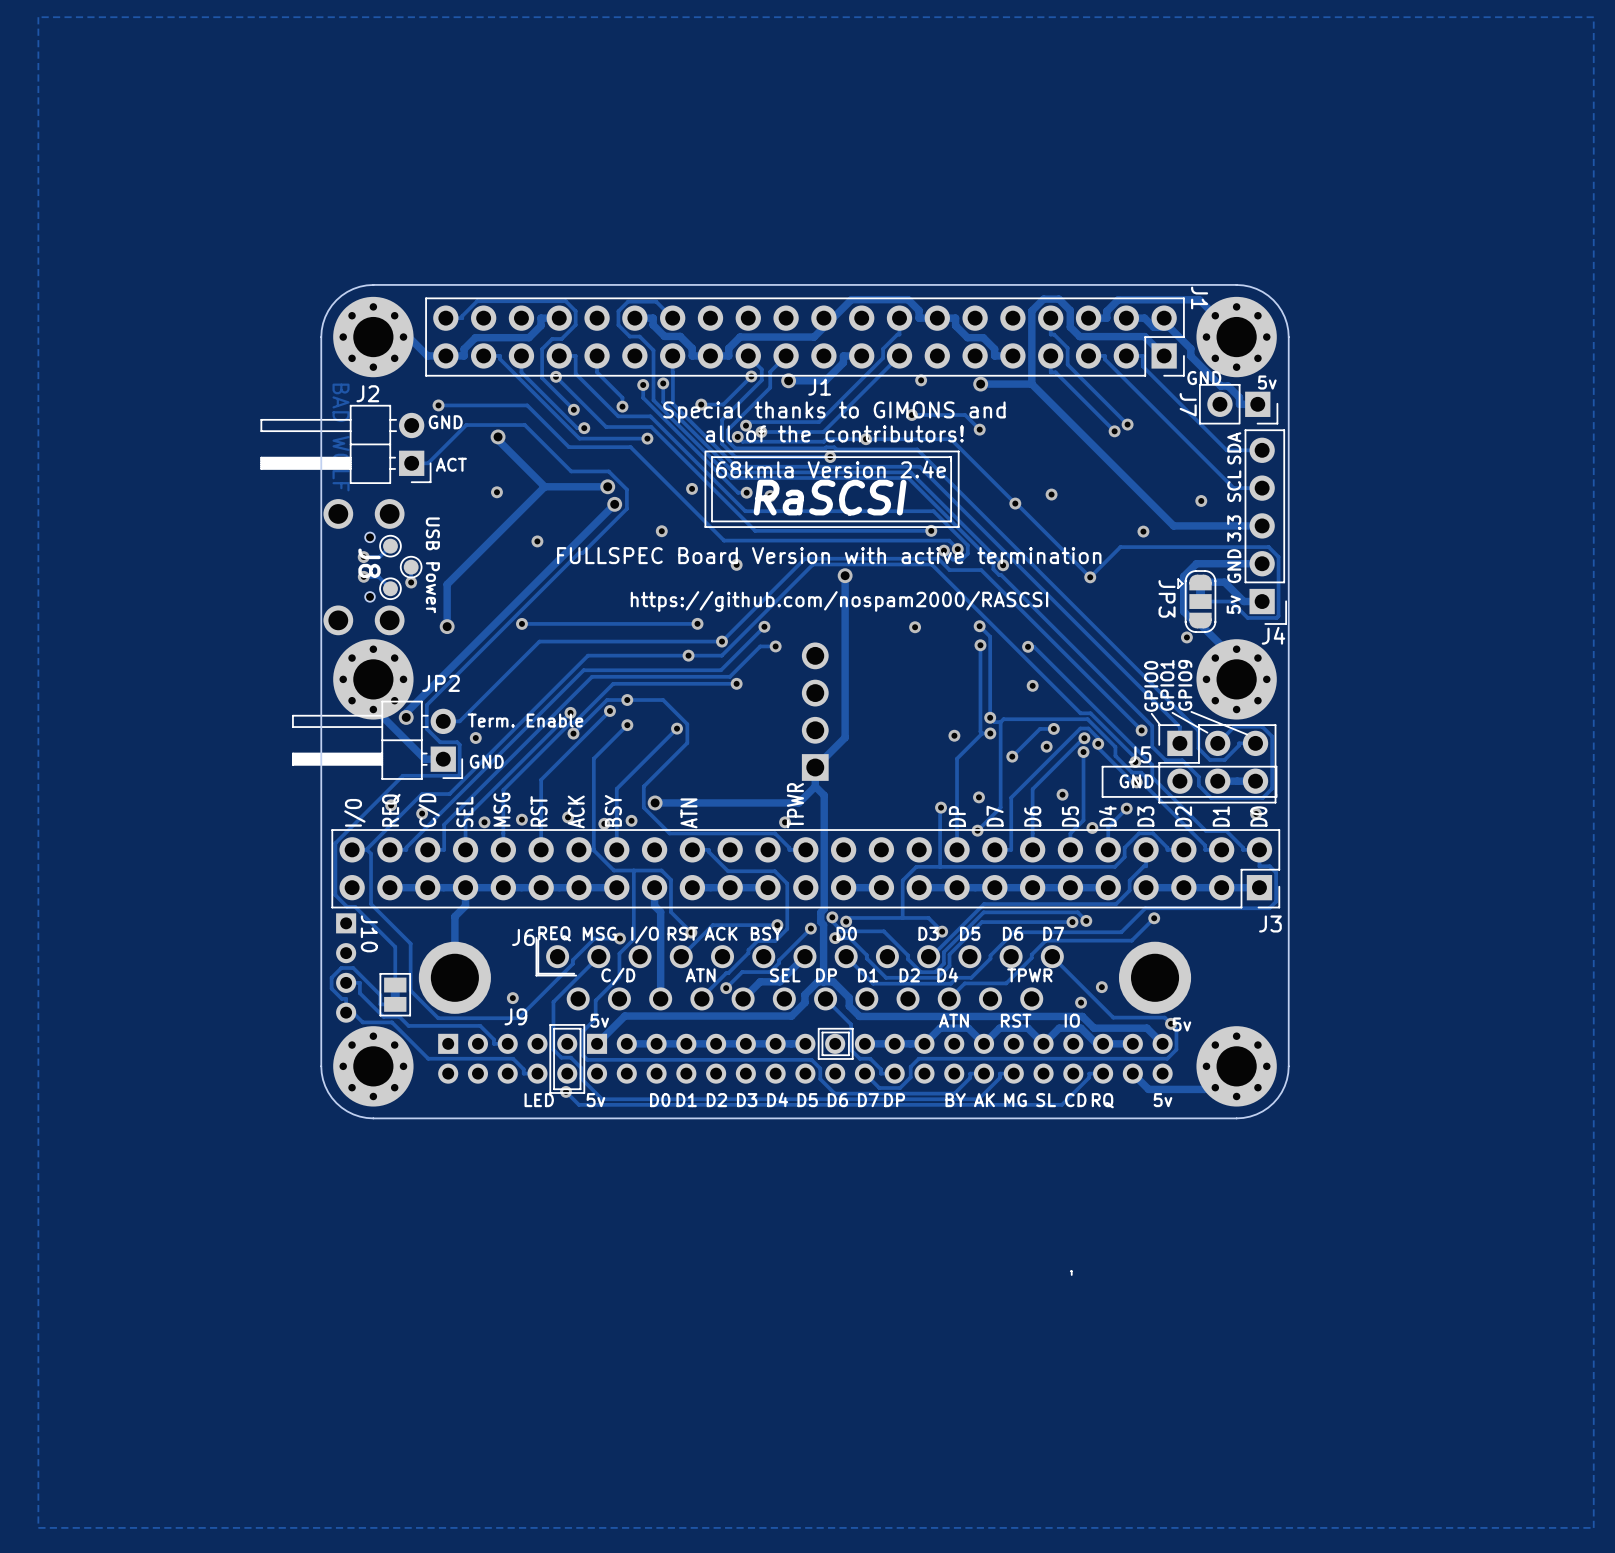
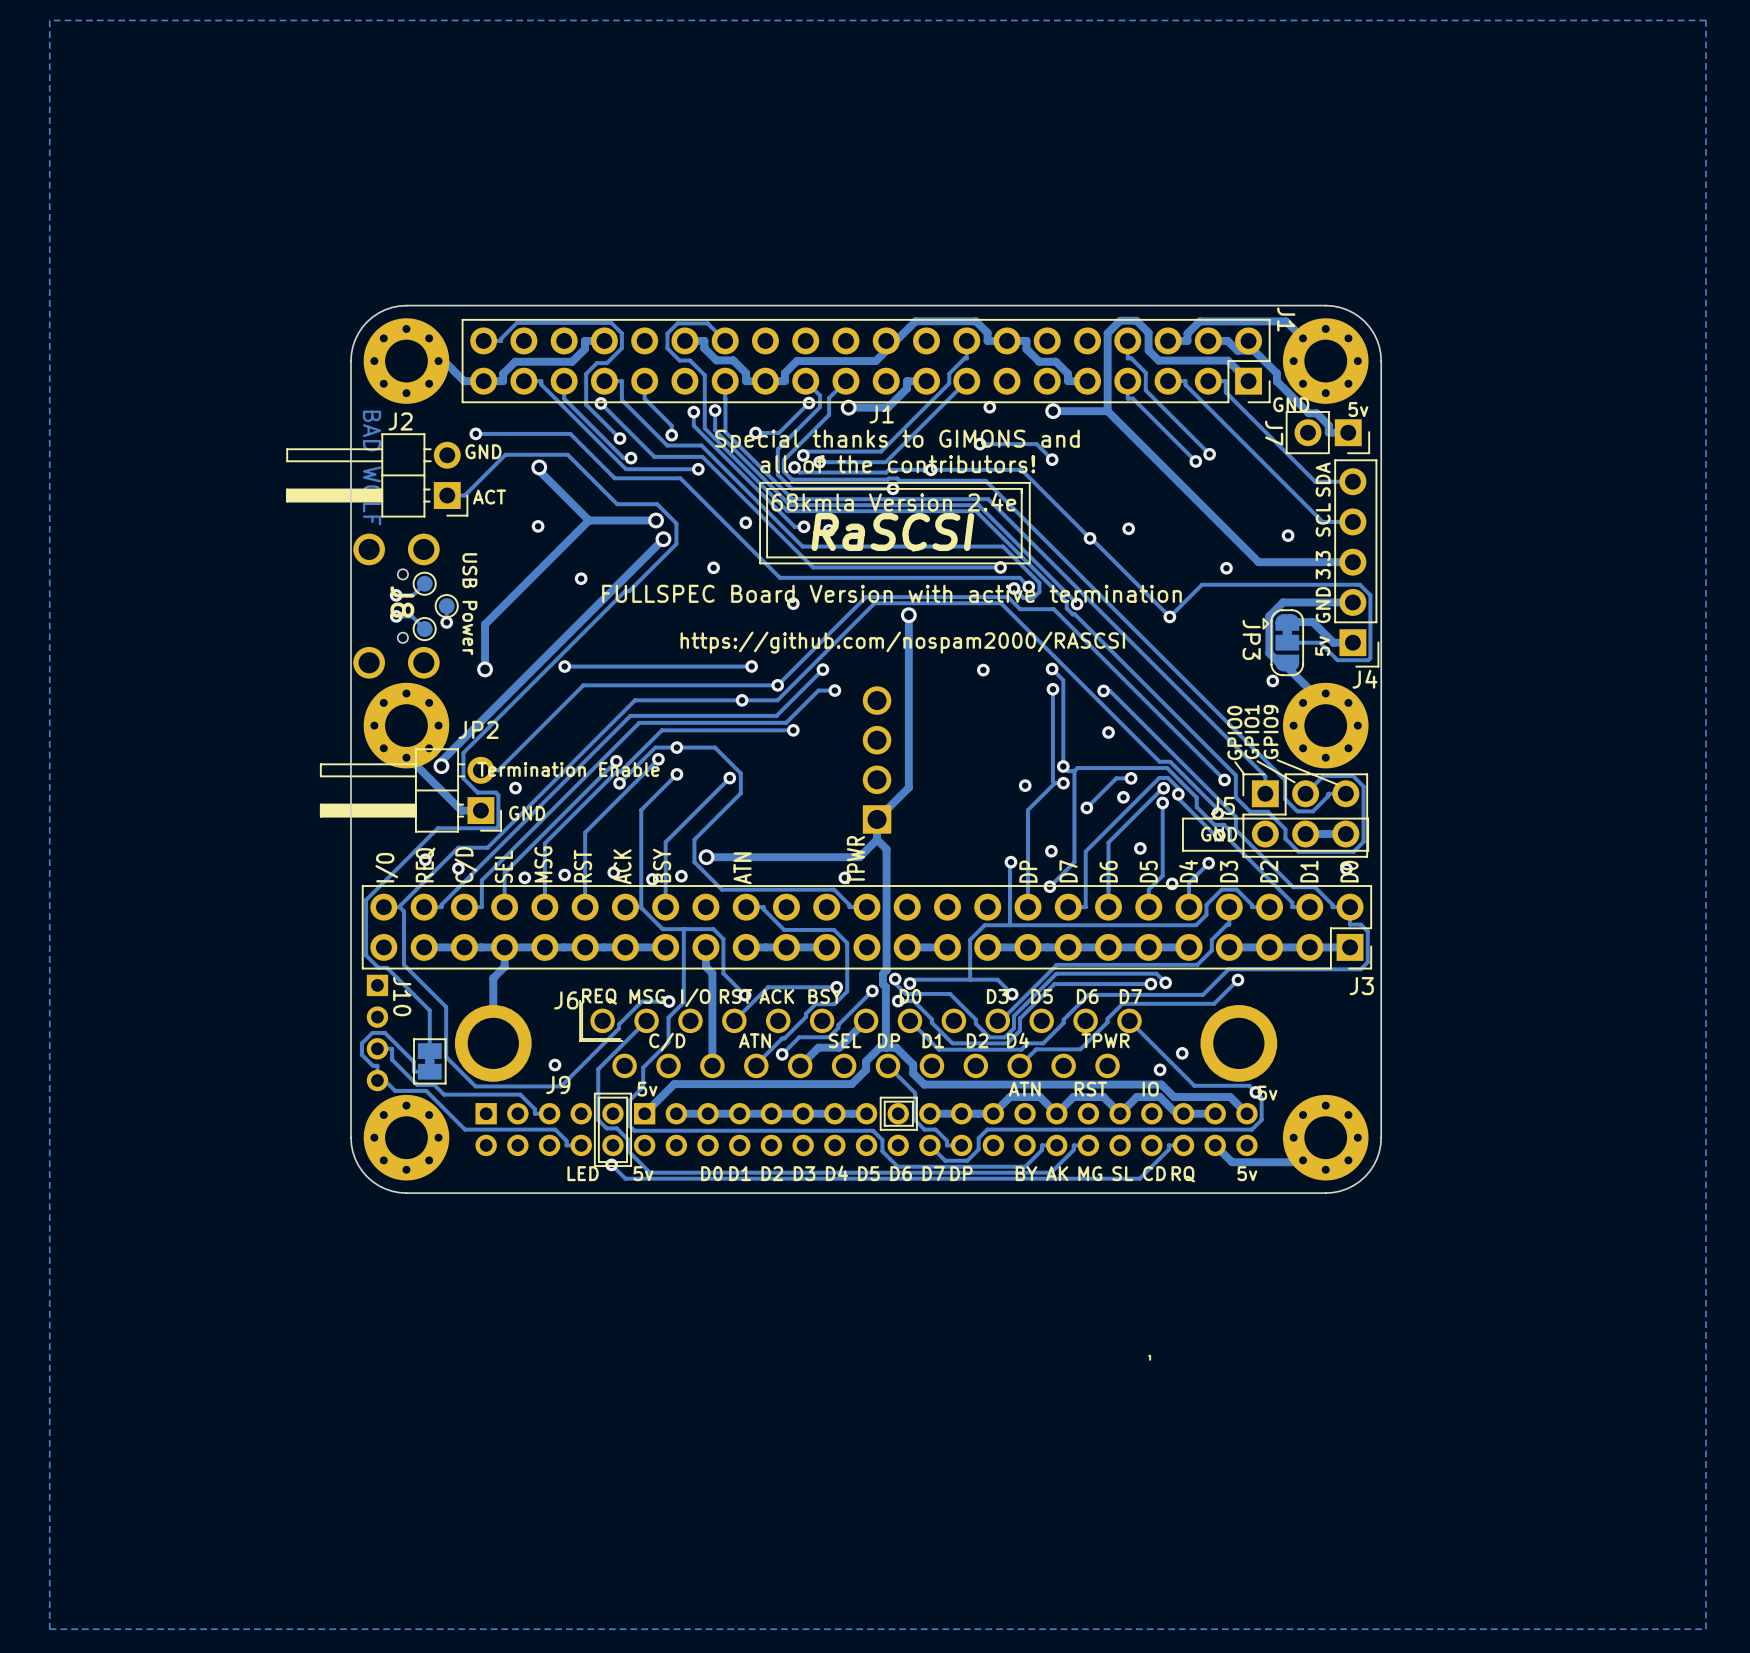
text: Term. Enable (525, 720) -> Termination Enable (568, 769)

